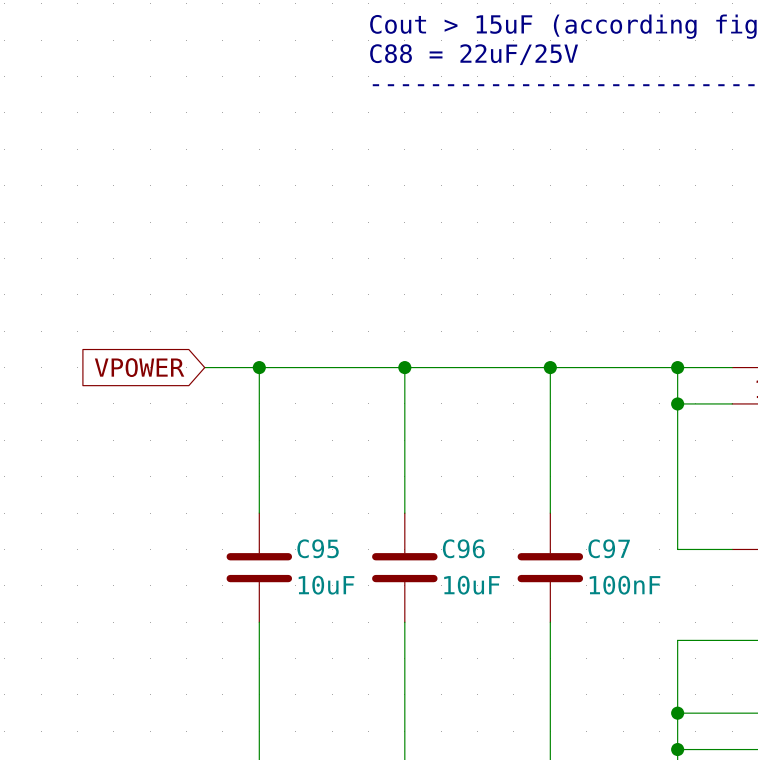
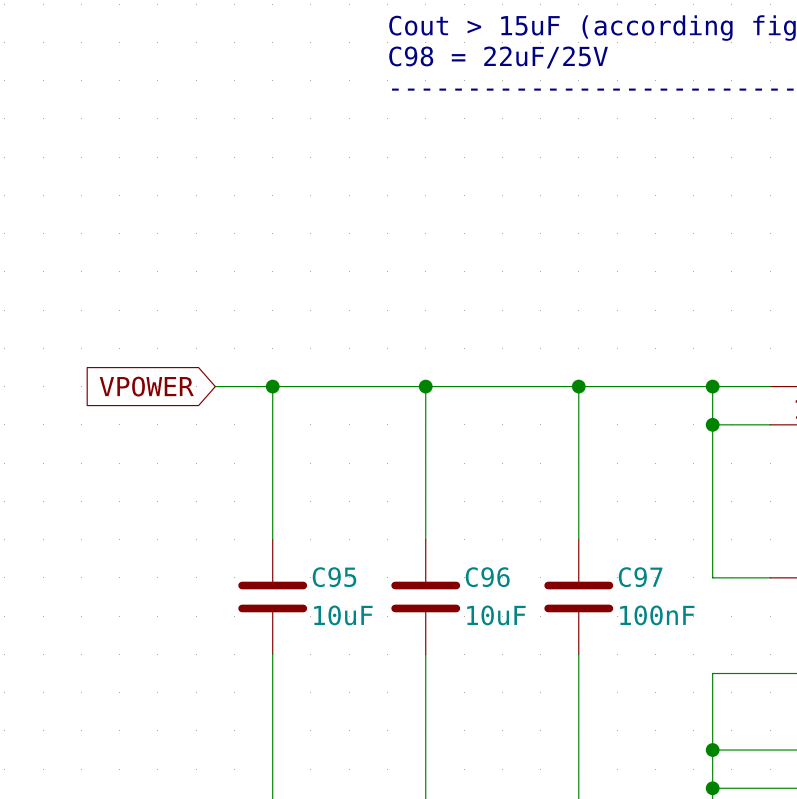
text: C88 = 22uF/25V (474, 54) -> C98 = 22uF/25V (498, 57)

